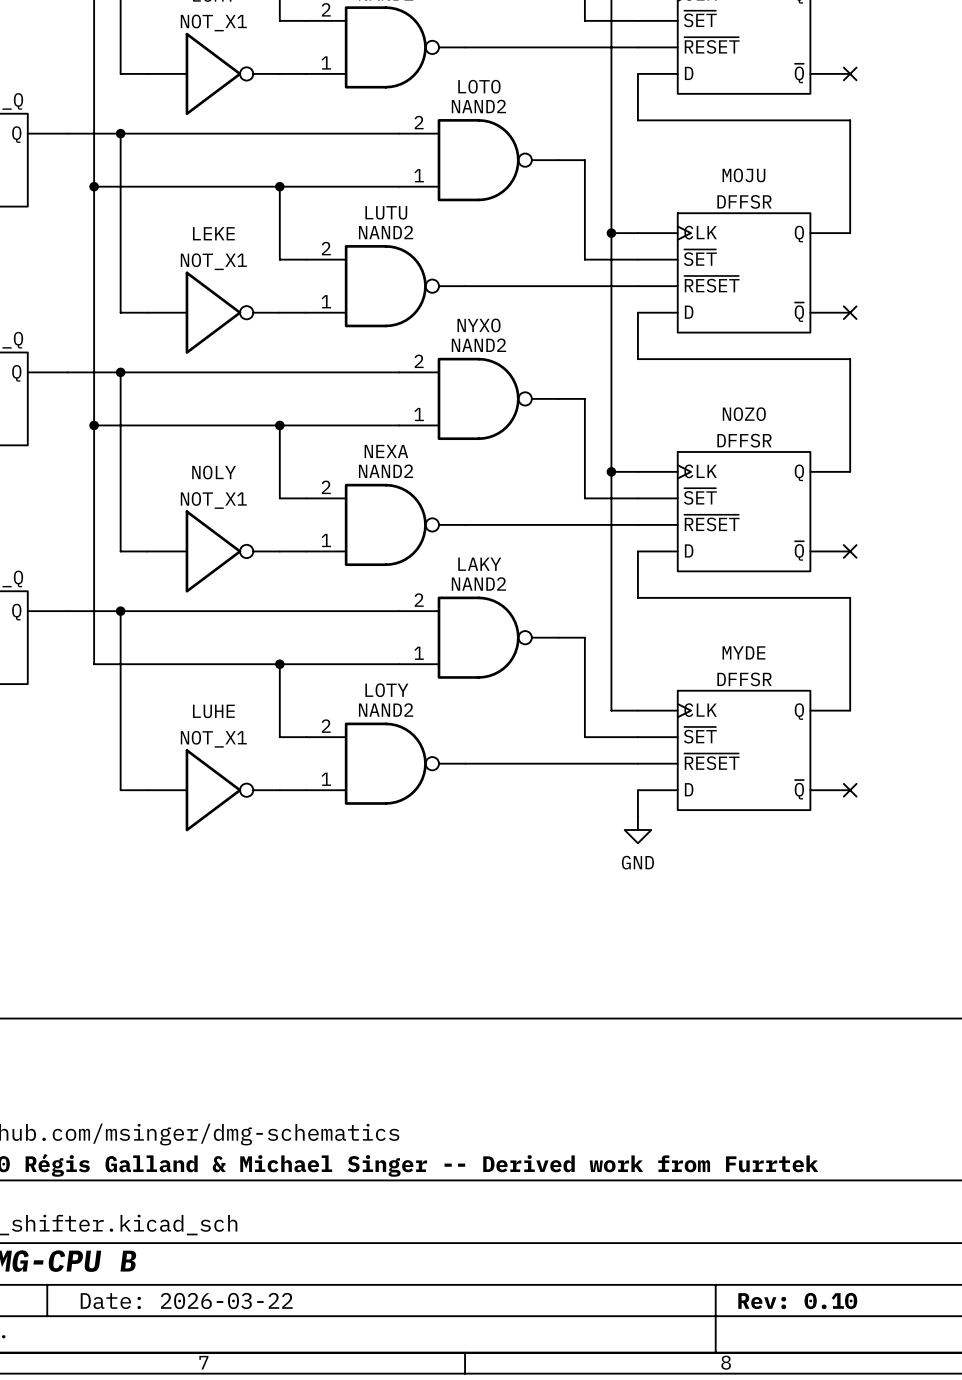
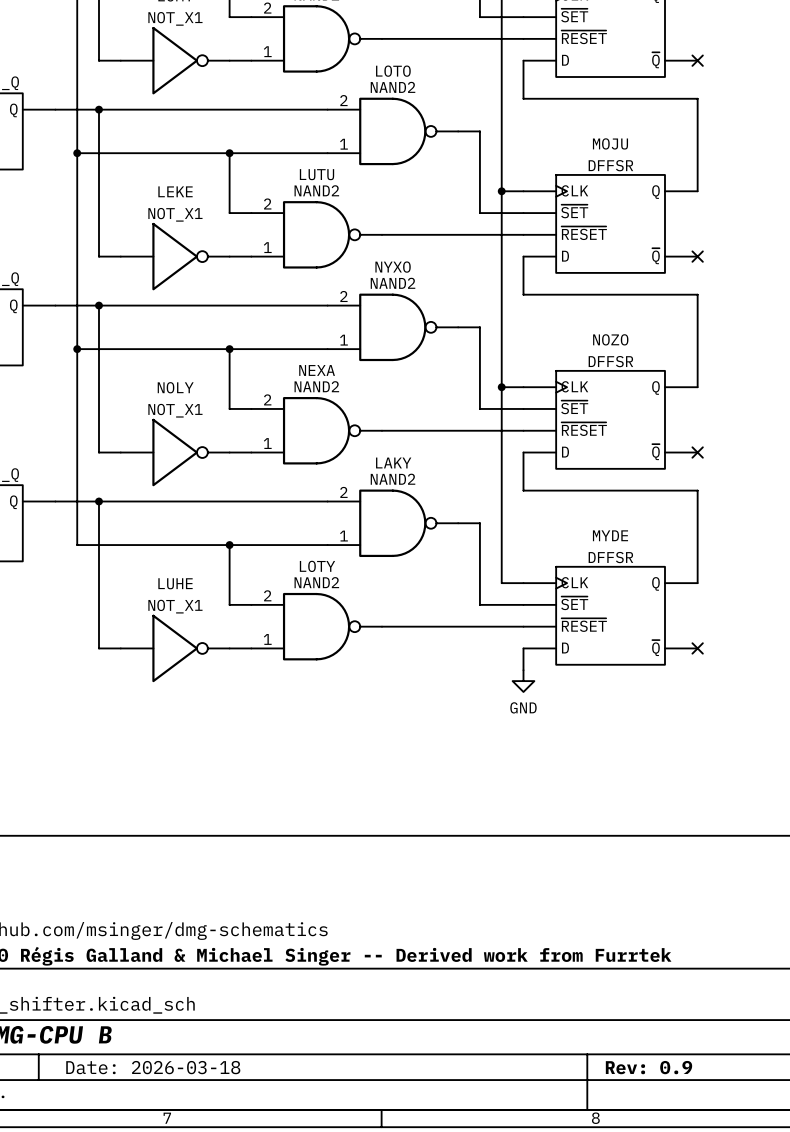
title block: Date: 2026-03-22 (186, 1300) -> Date: 2026-03-18 (153, 1067)
title block: Rev: 0.10 (797, 1300) -> Rev: 0.9 (649, 1067)

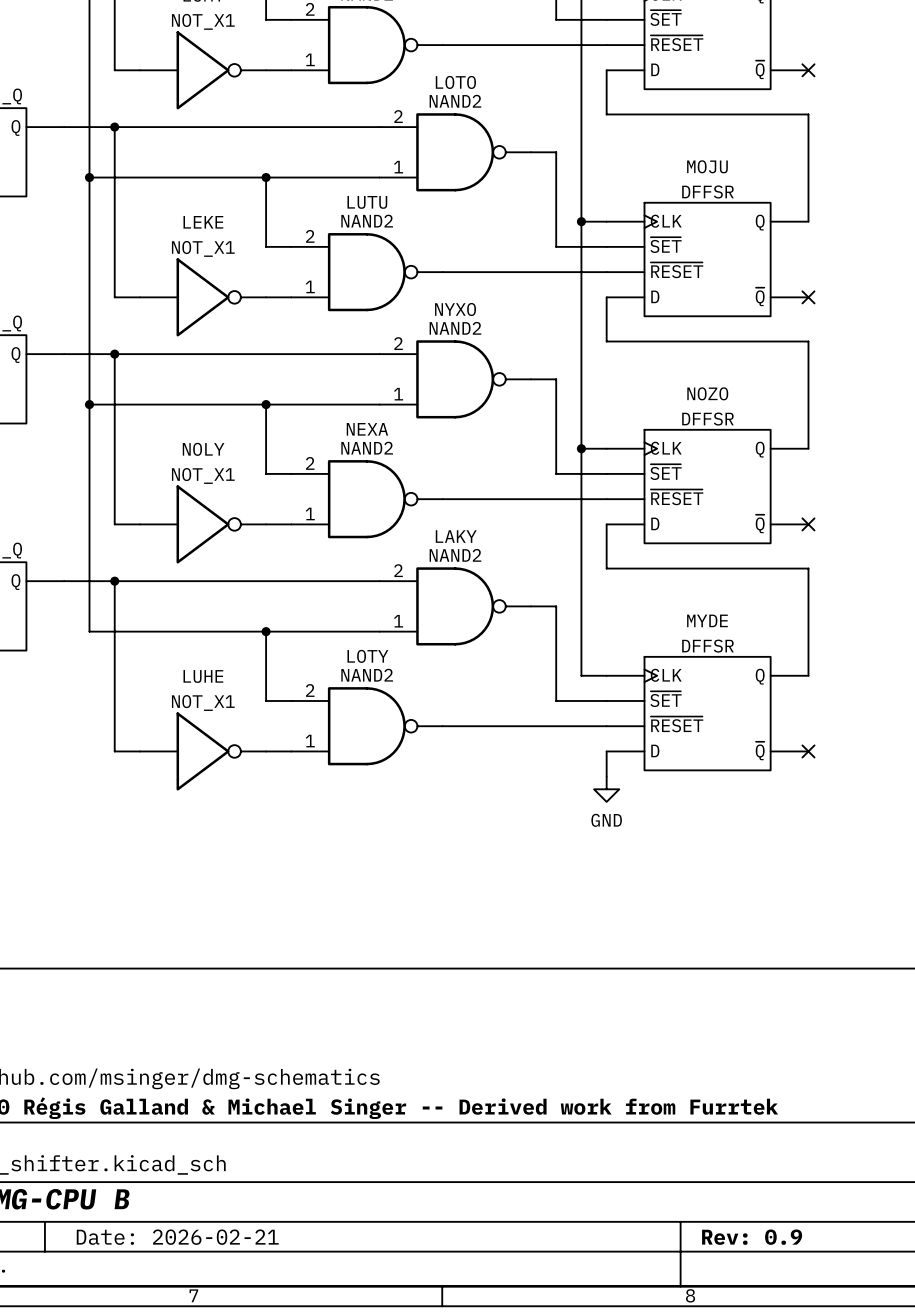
title block: Date: 2026-03-18 (153, 1067) -> Date: 2026-02-21 (177, 1237)

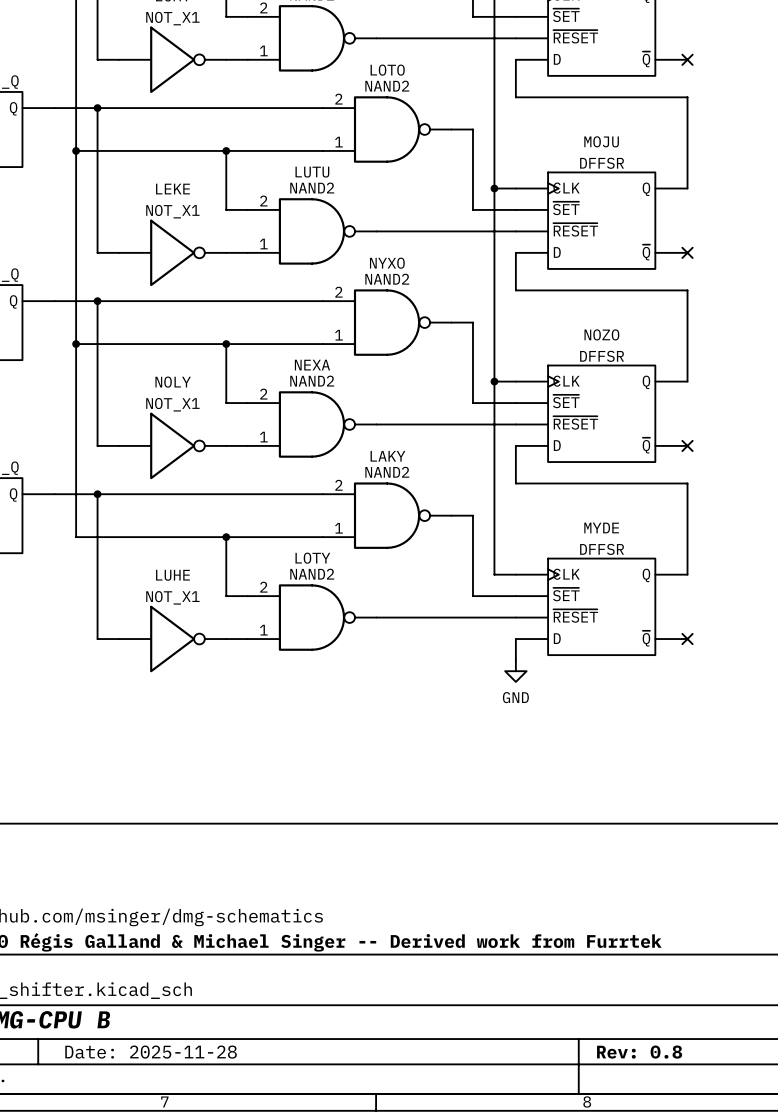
title block: Date: 2026-02-21 (177, 1237) -> Date: 2025-11-28 (151, 1052)
title block: Rev: 0.9 (752, 1237) -> Rev: 0.8 (639, 1052)

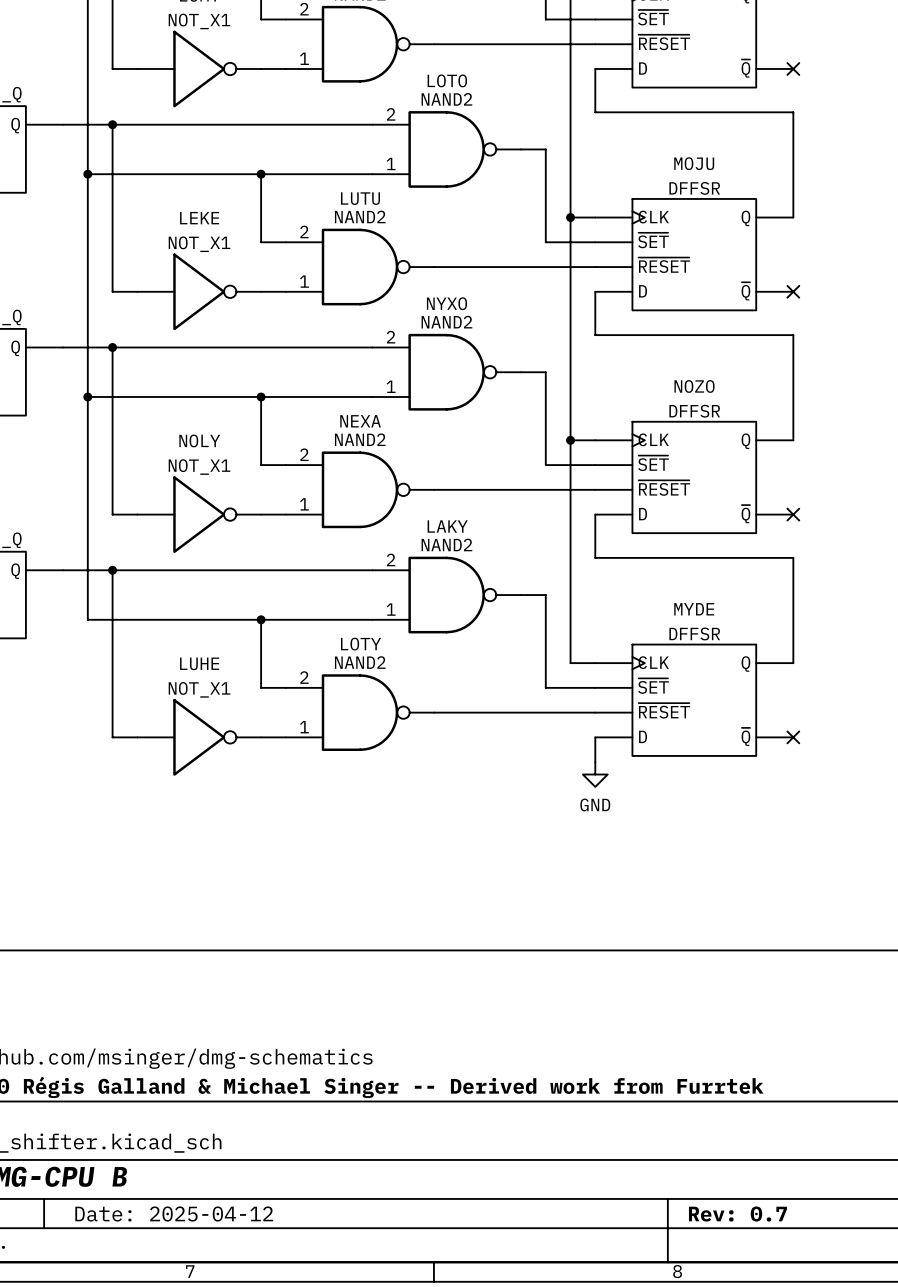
title block: Date: 2025-11-28 (151, 1052) -> Date: 2025-04-12 (174, 1214)
title block: Rev: 0.8 (639, 1052) -> Rev: 0.7 (737, 1214)

